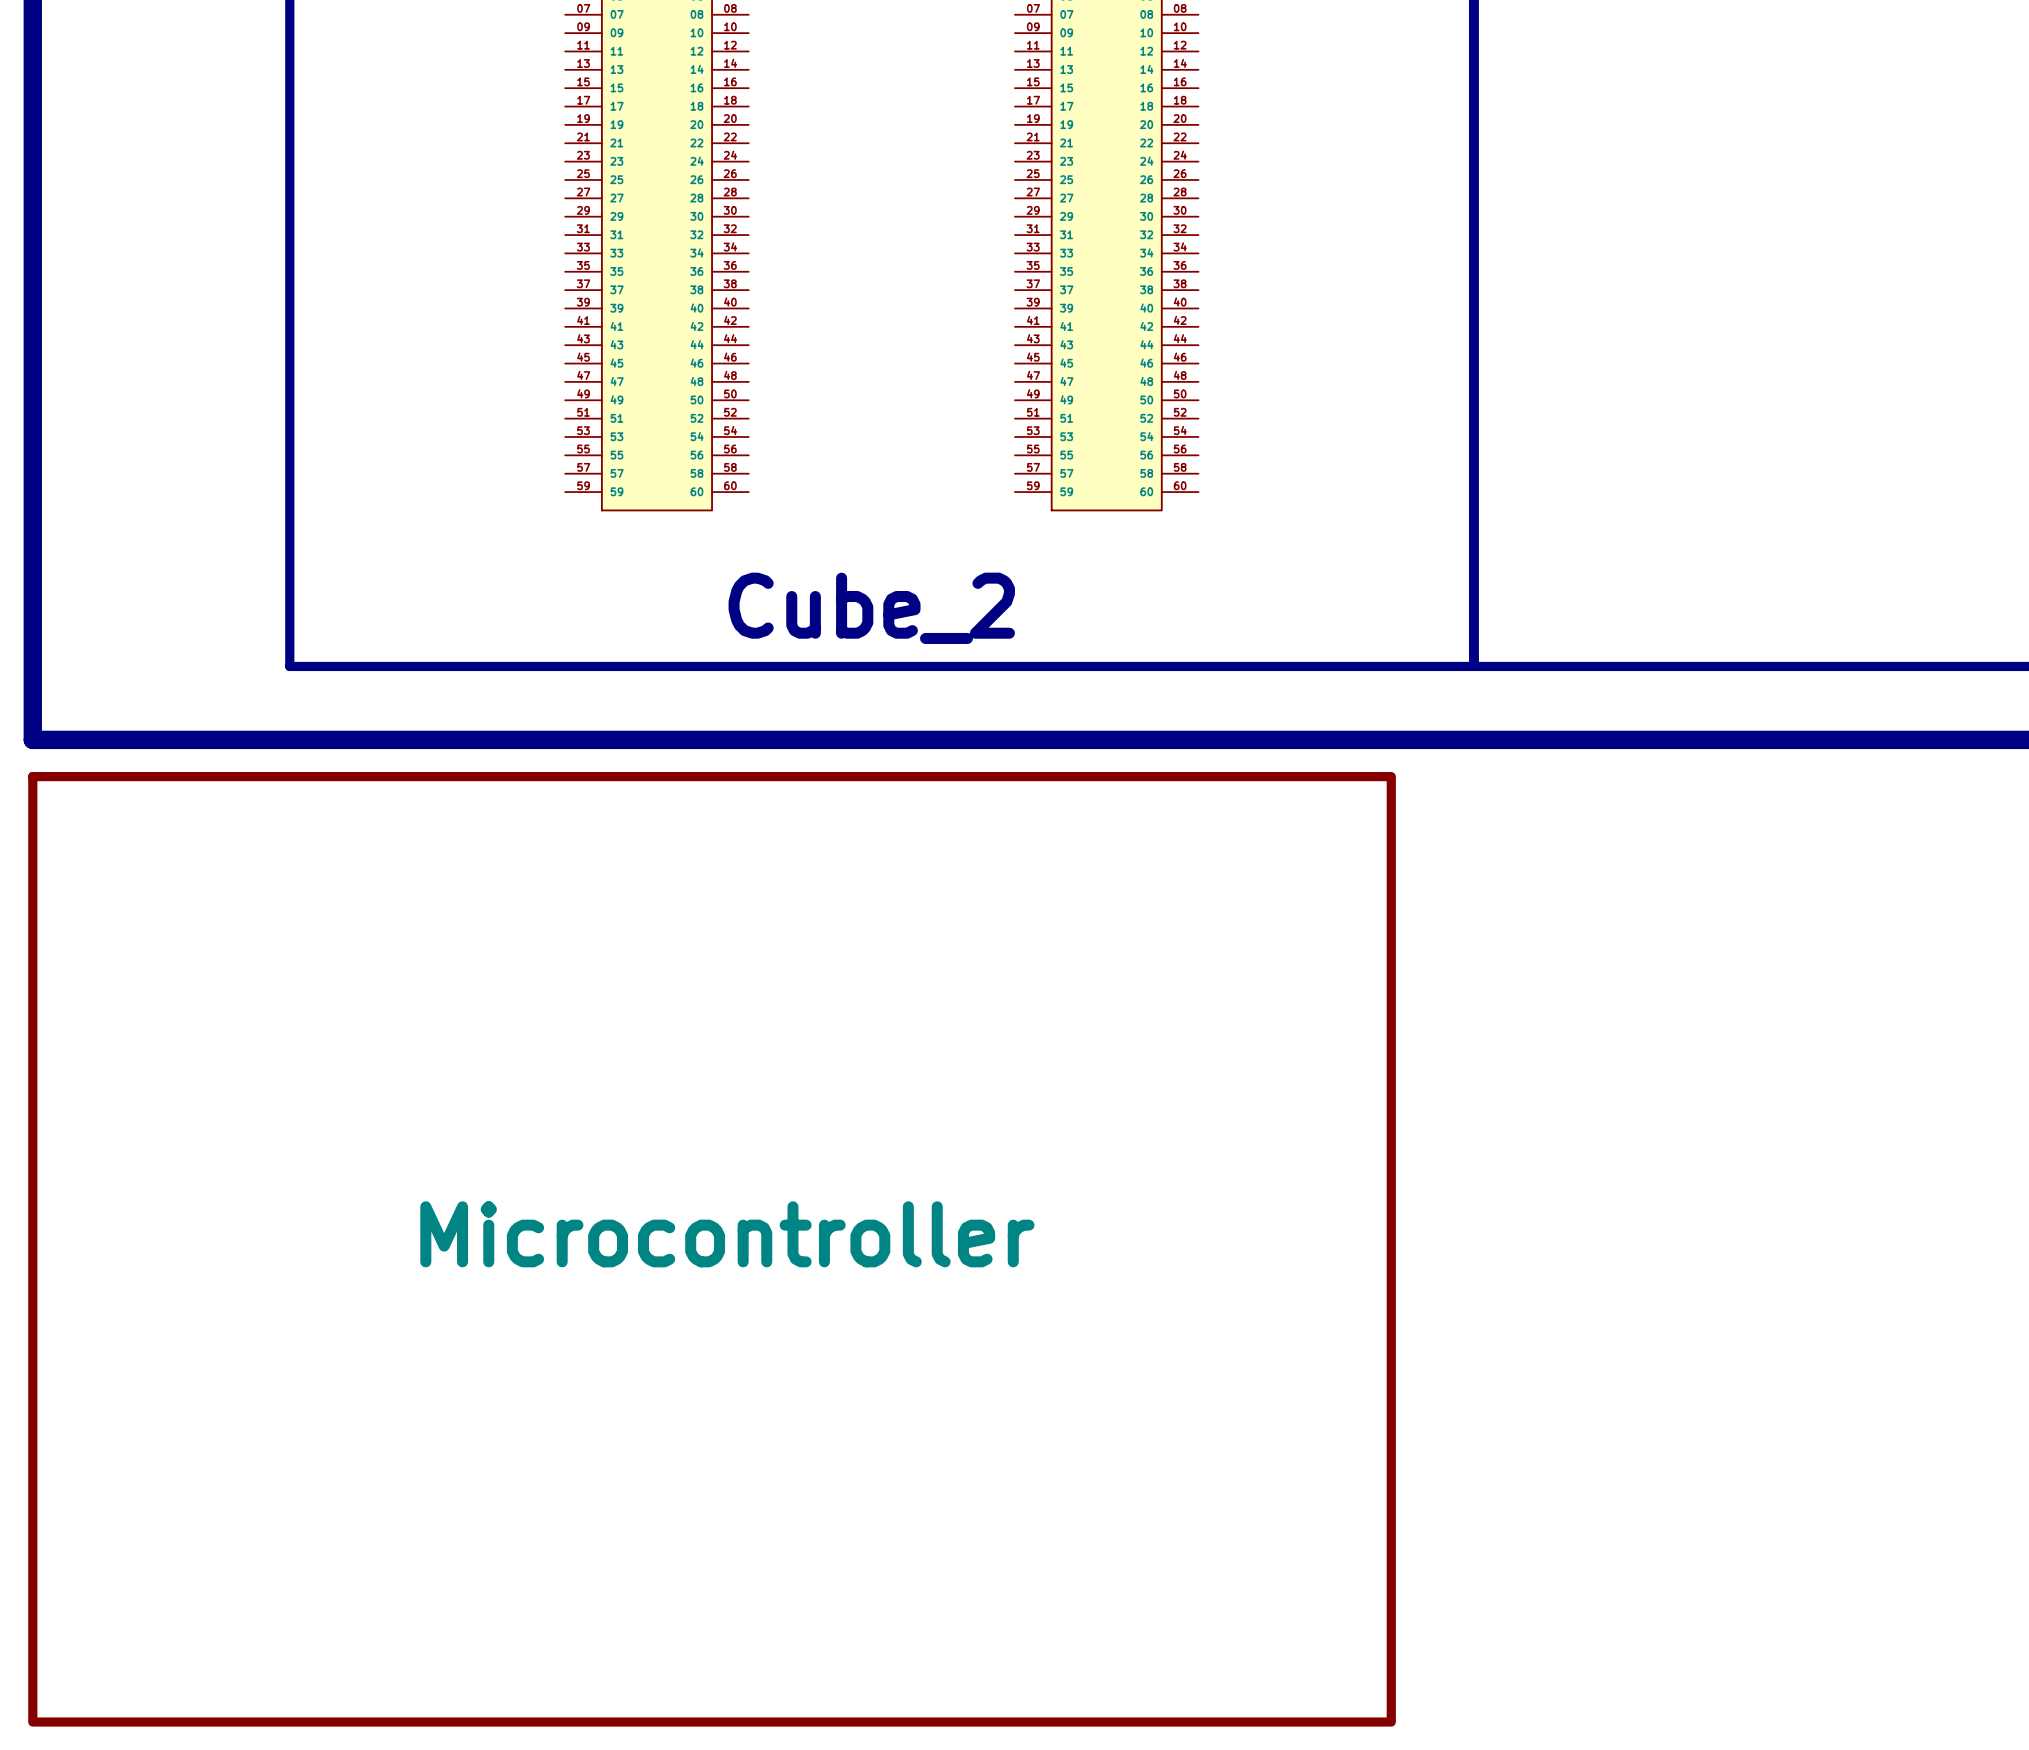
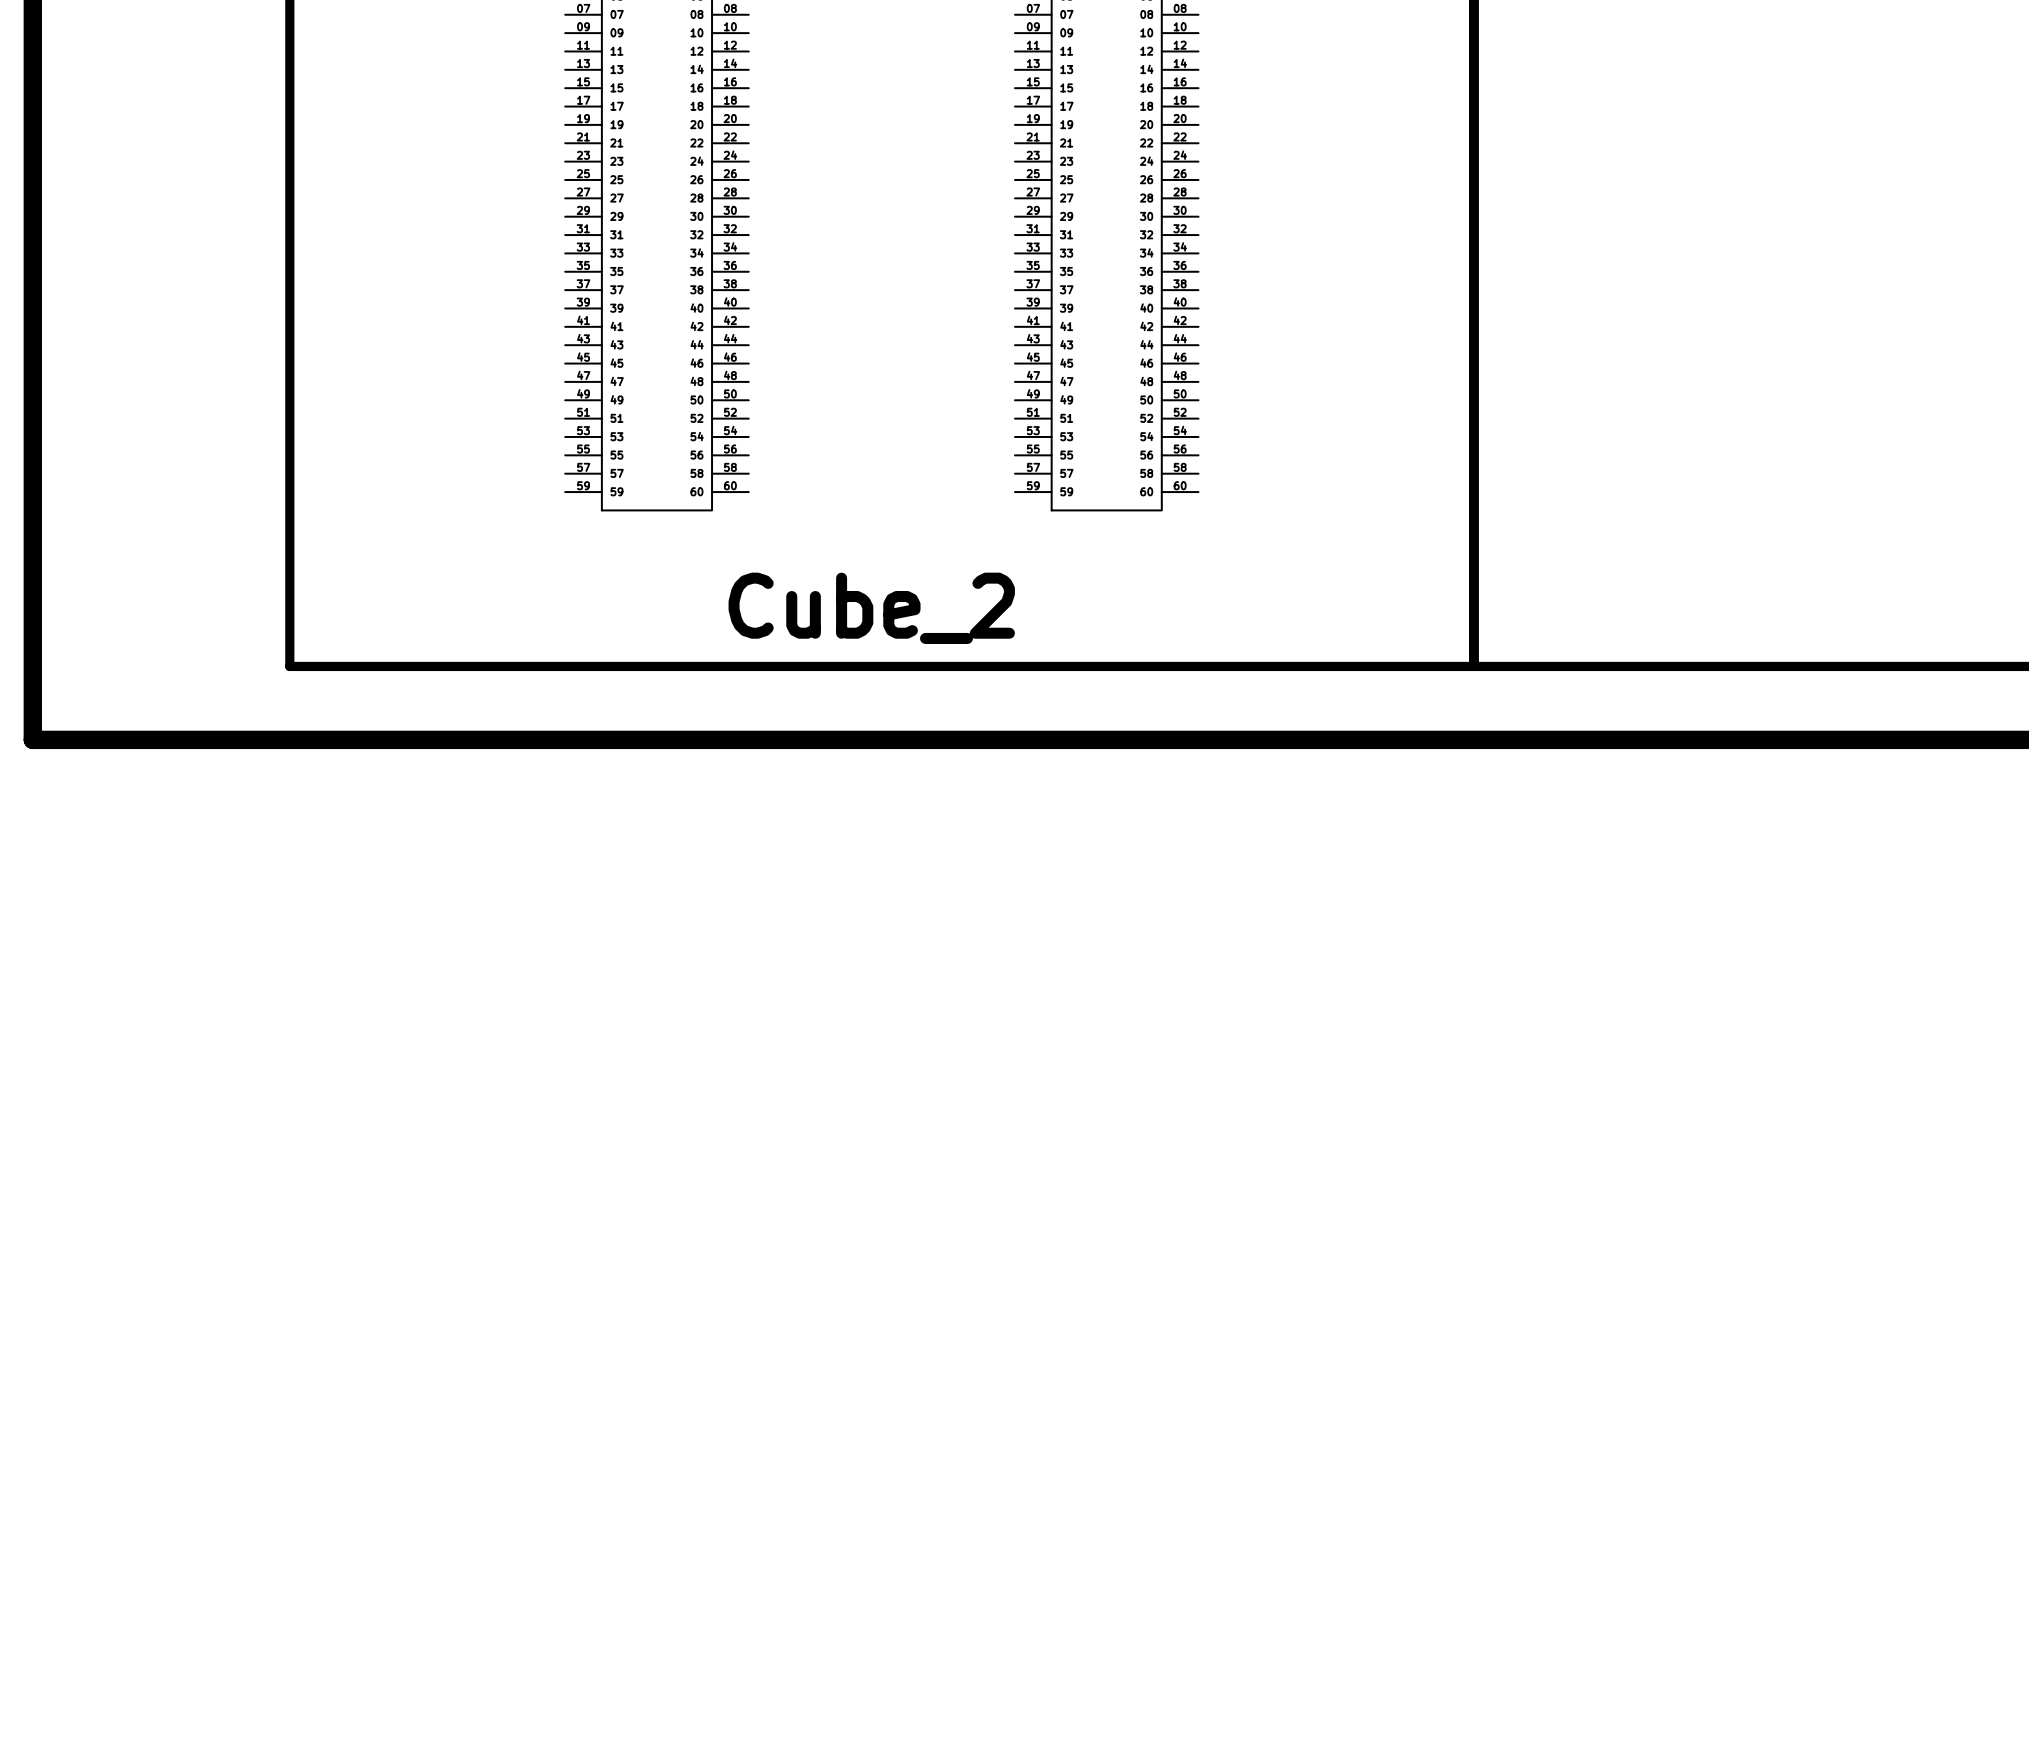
sheet Microcontroller: (712, 1249) -> none

